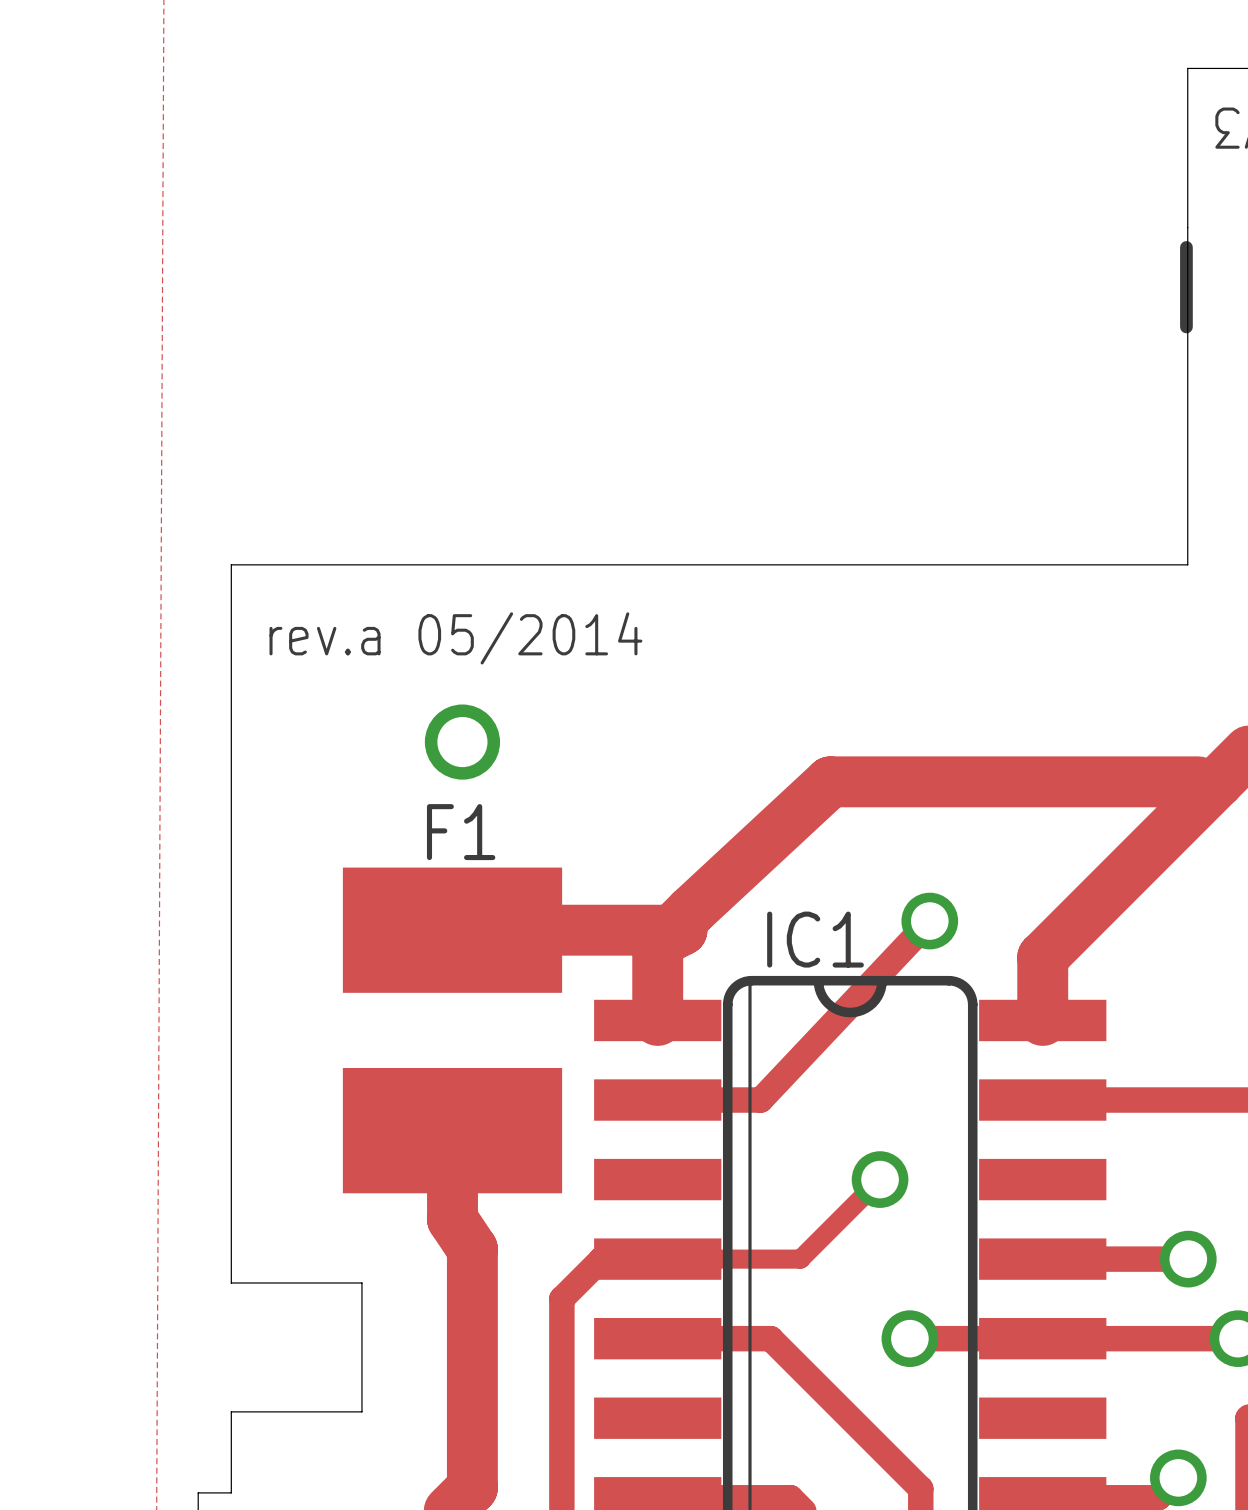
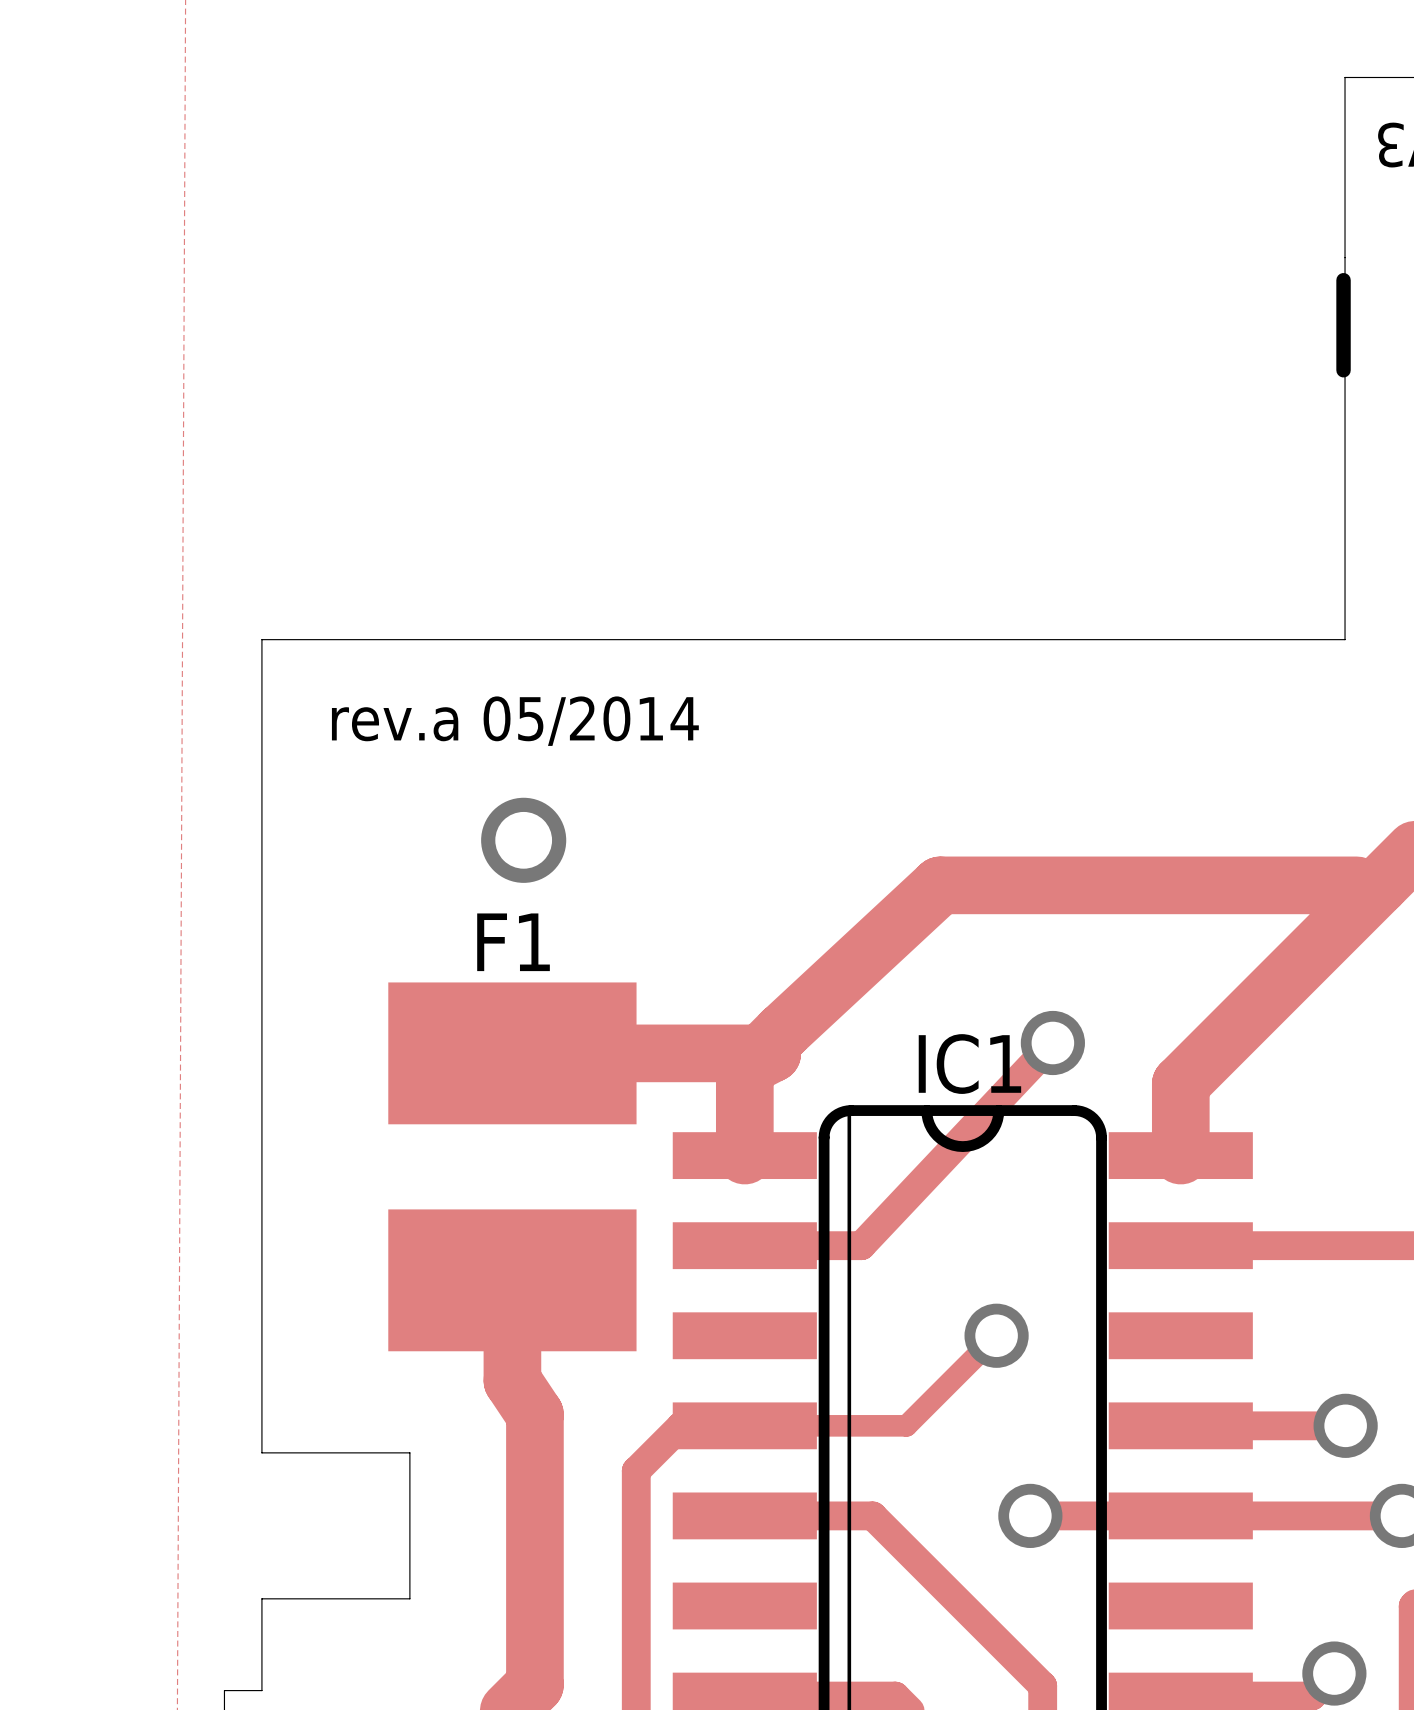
IC1 name position: IC1 (815, 939) -> IC1 (969, 1064)

